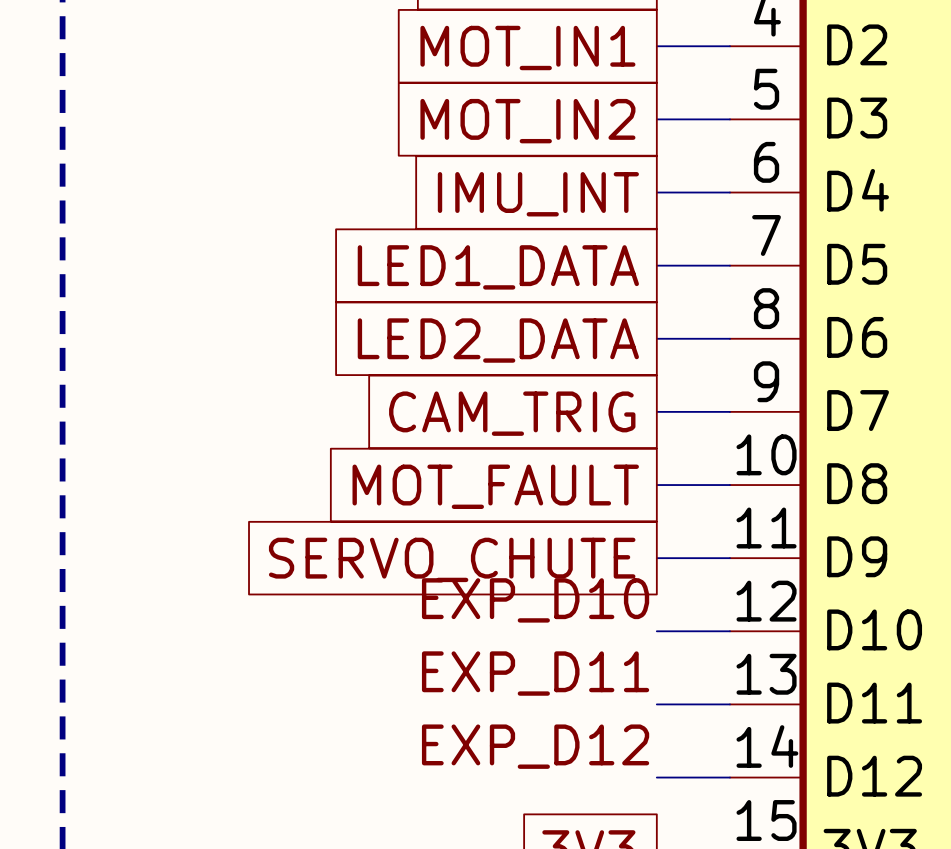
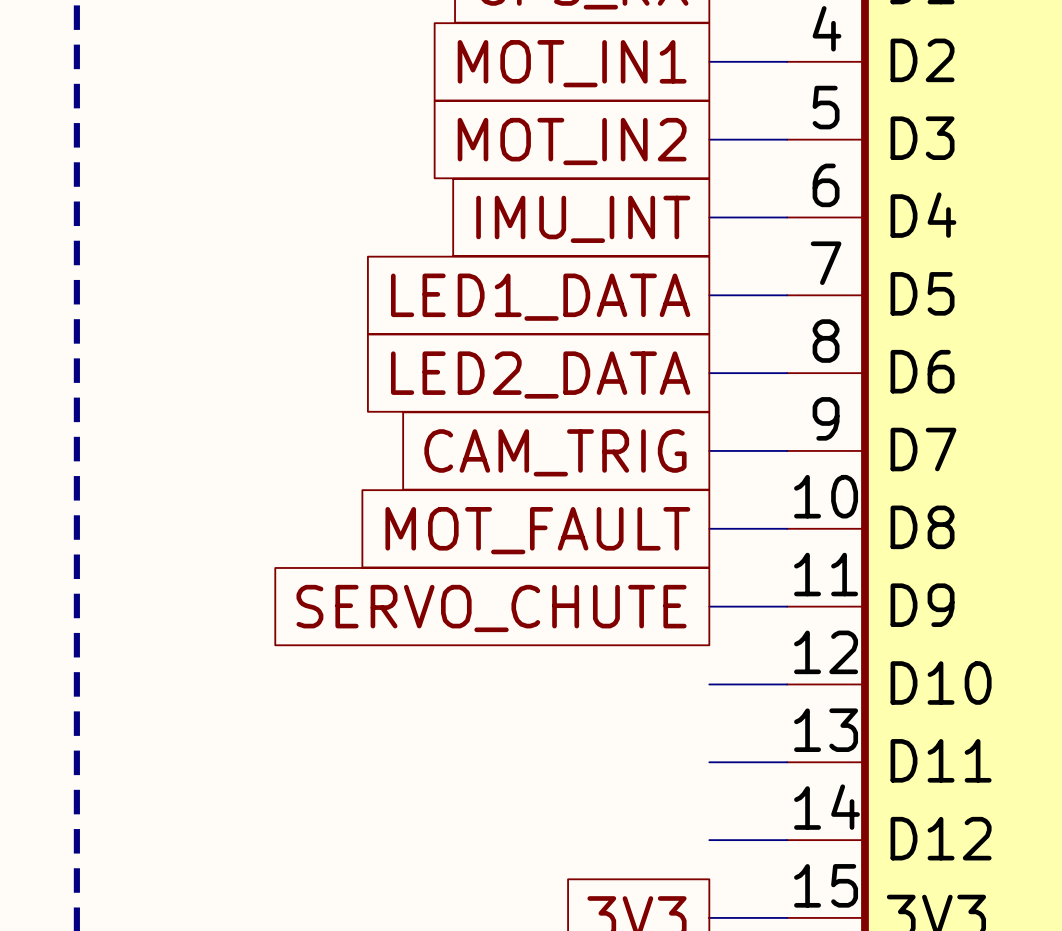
label: EXP_D10 (535, 600) -> none
label: EXP_D11 (535, 673) -> none
label: EXP_D12 (535, 746) -> none

